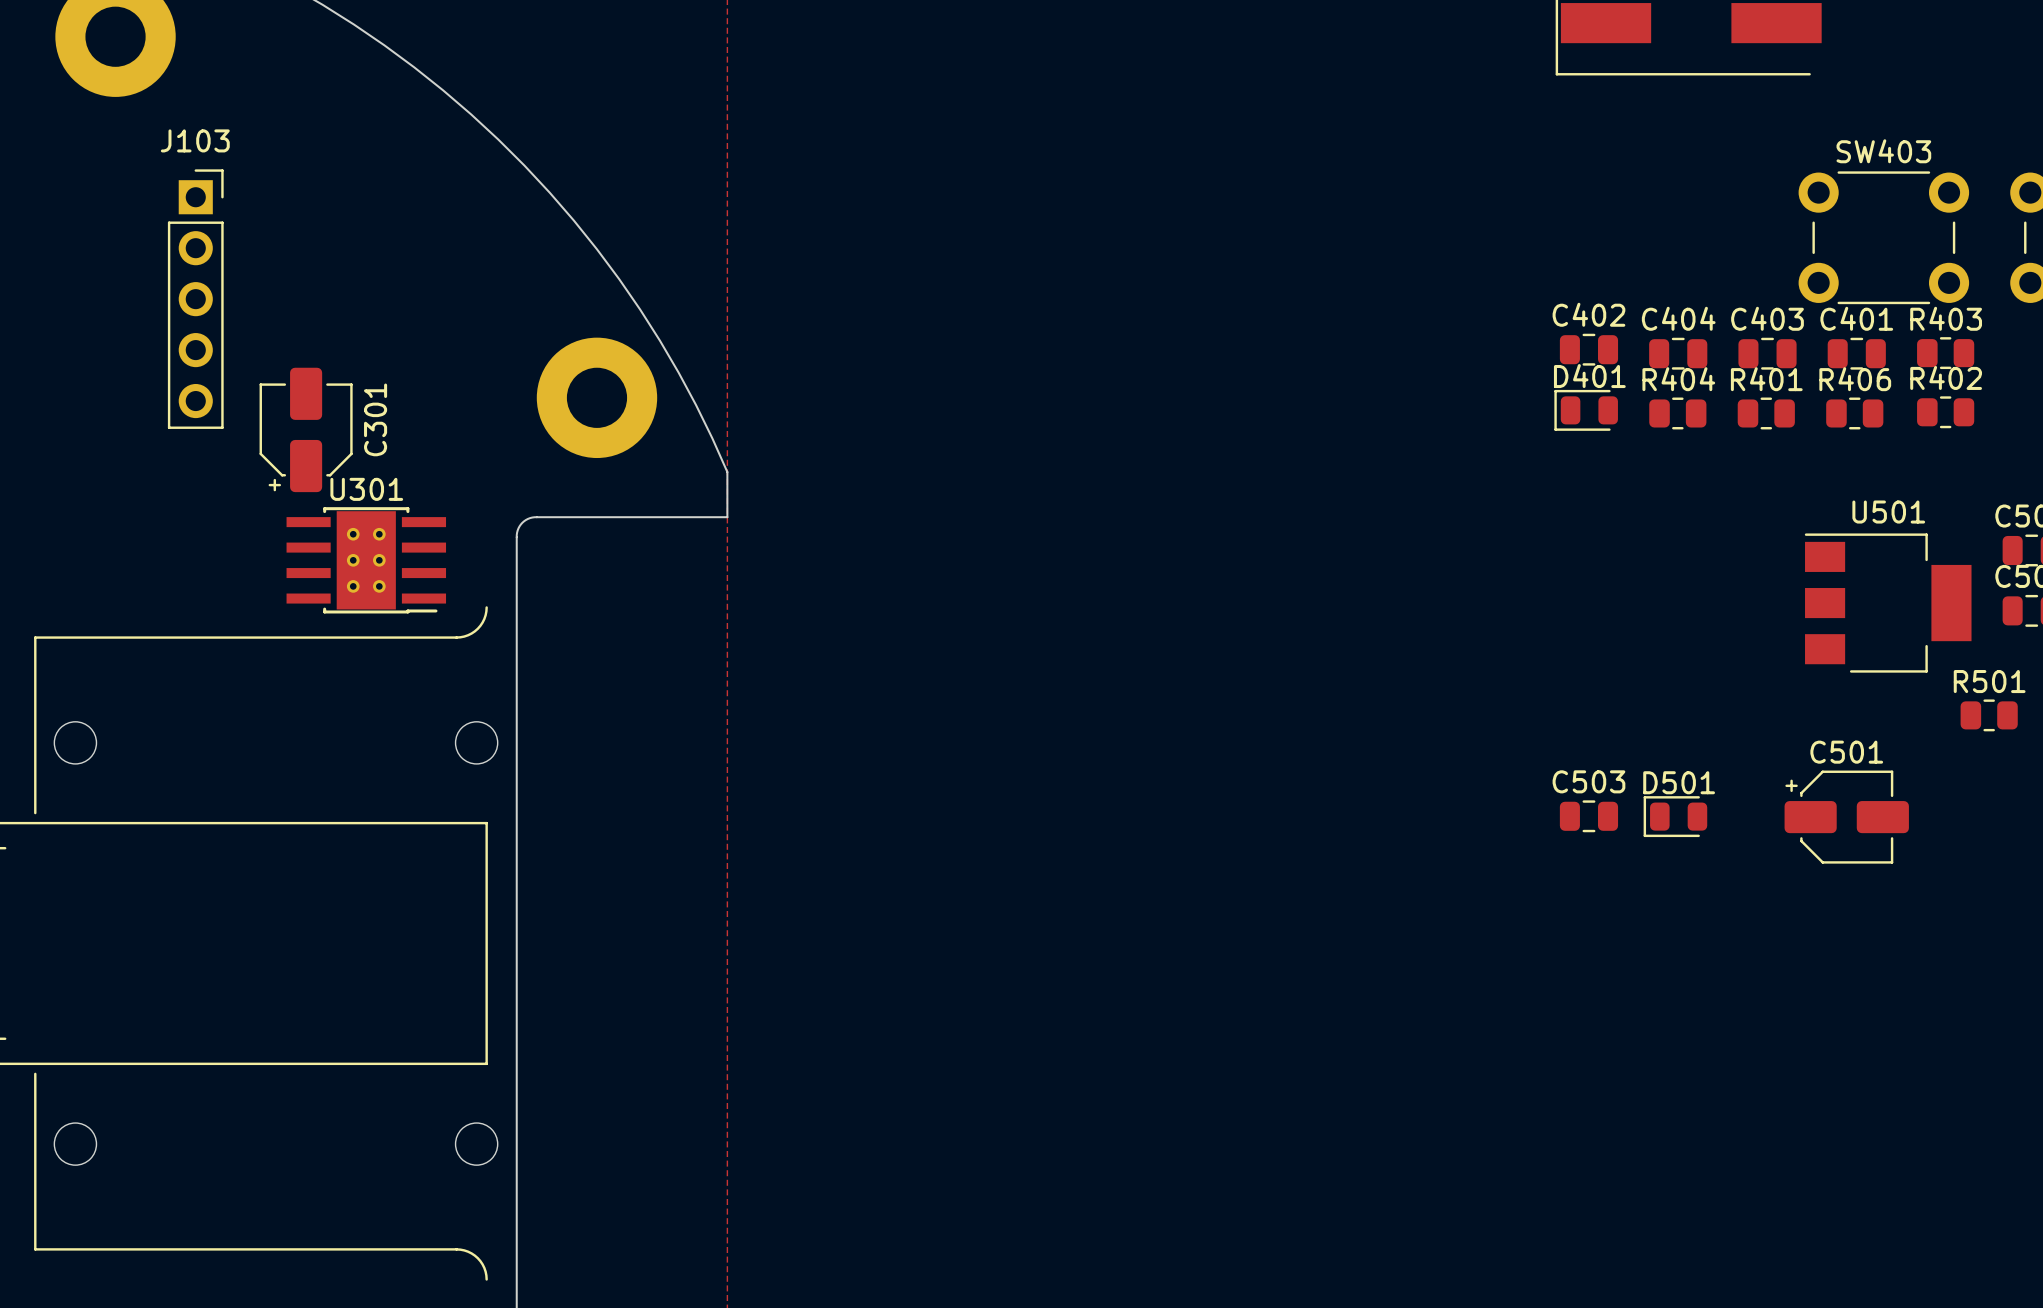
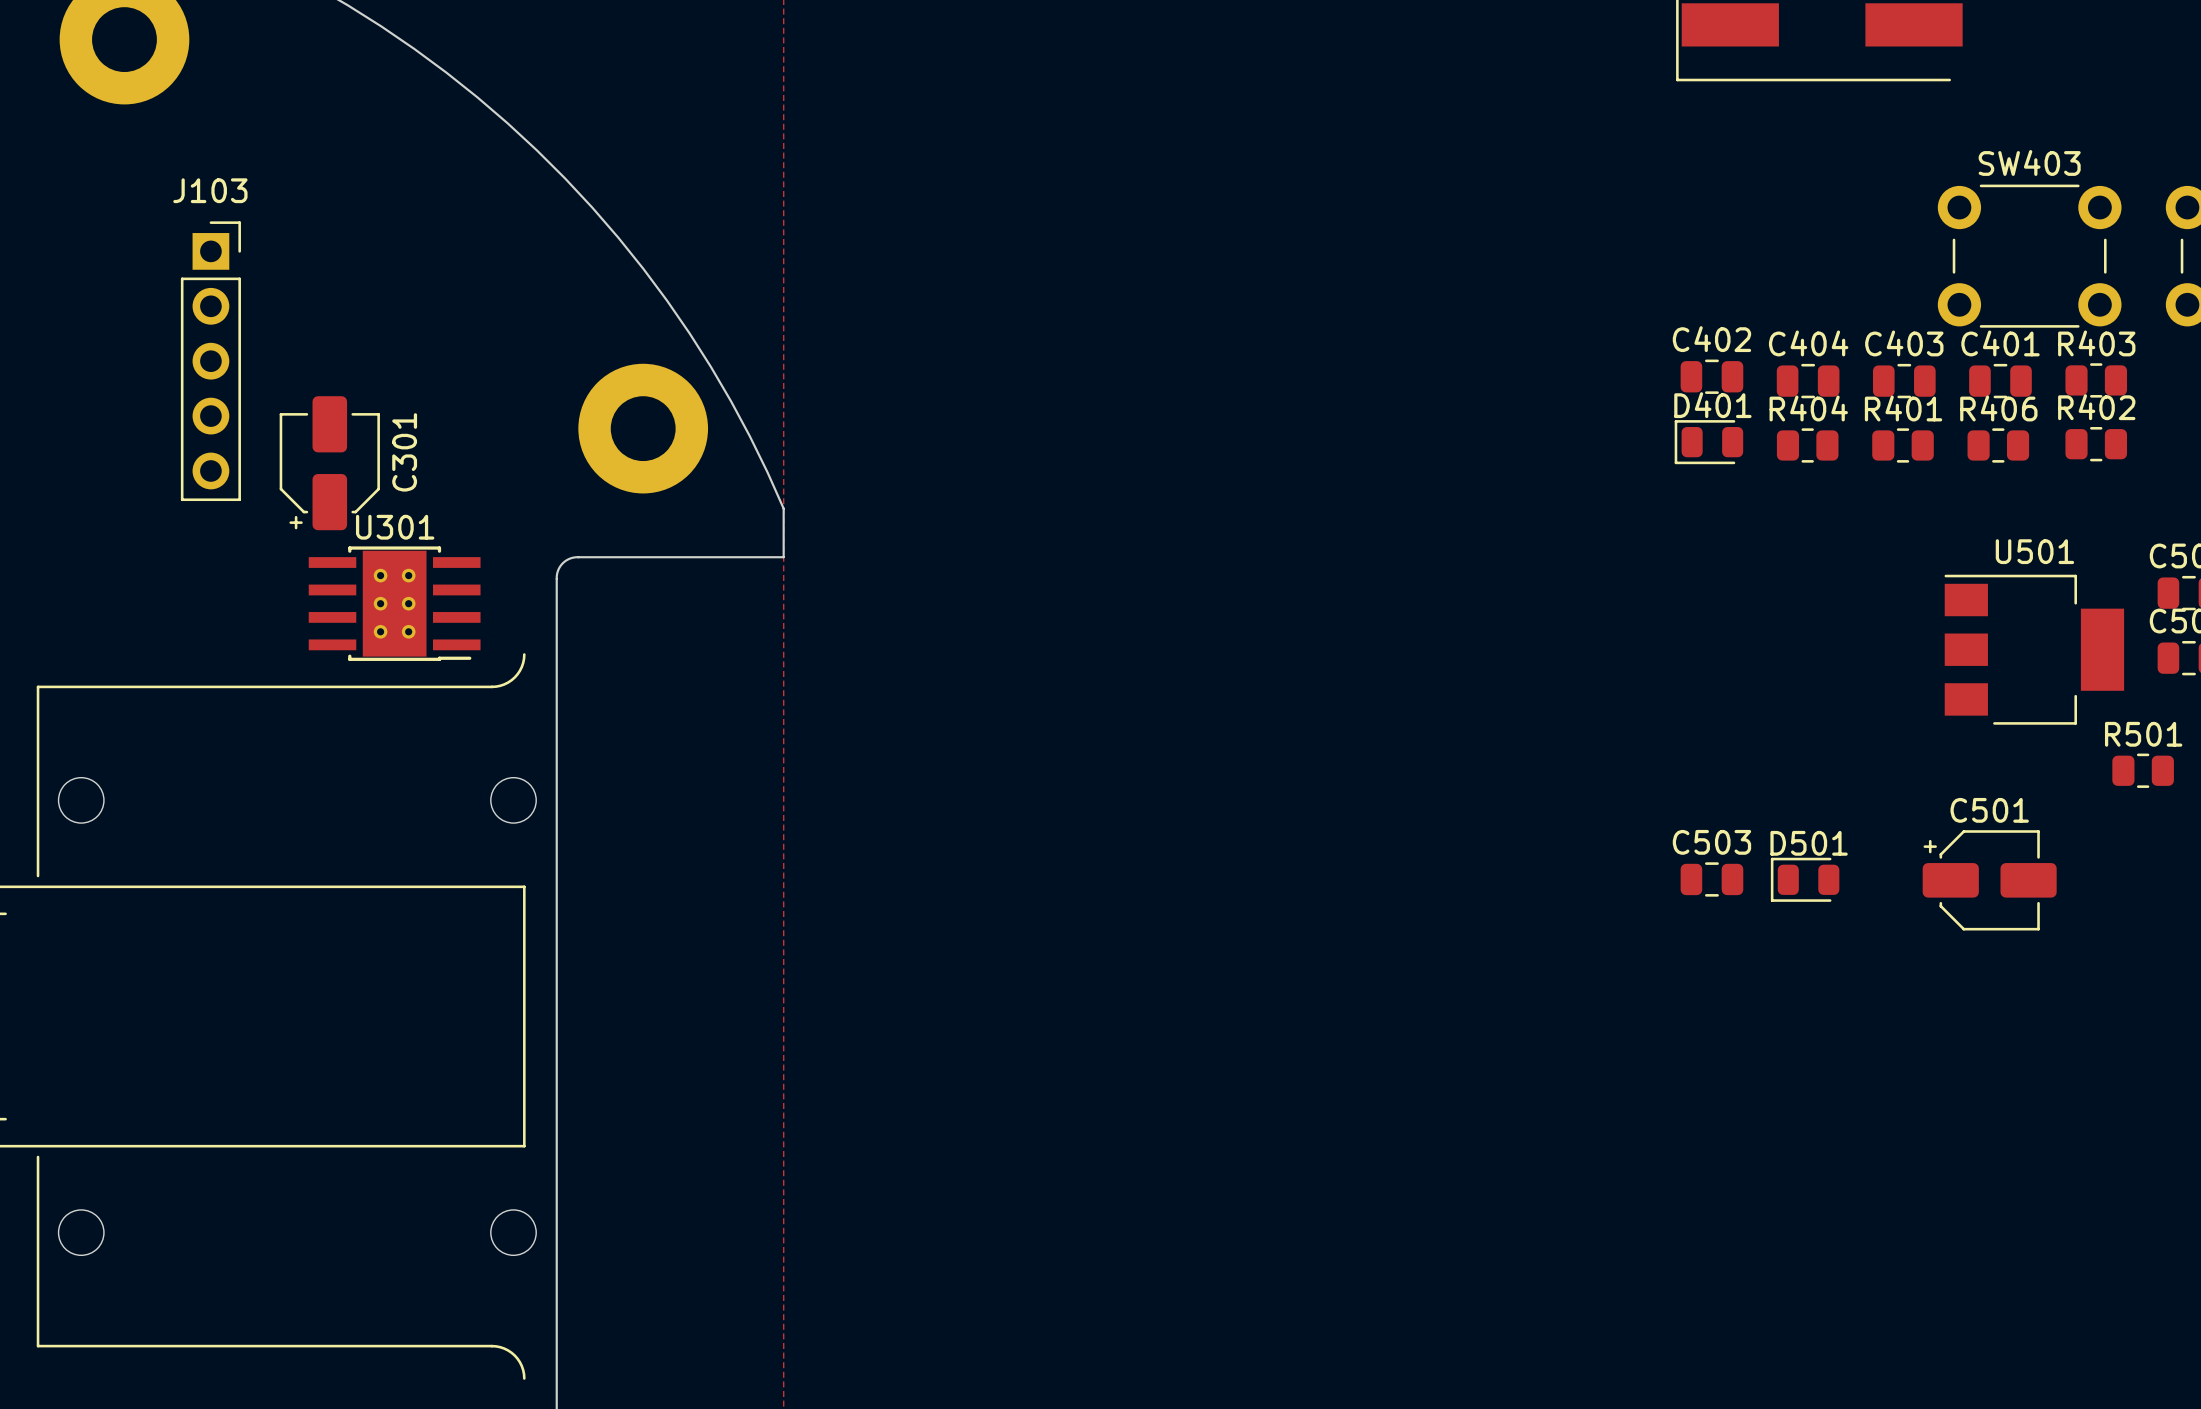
J103 position: (195, 299) -> (210, 361)

